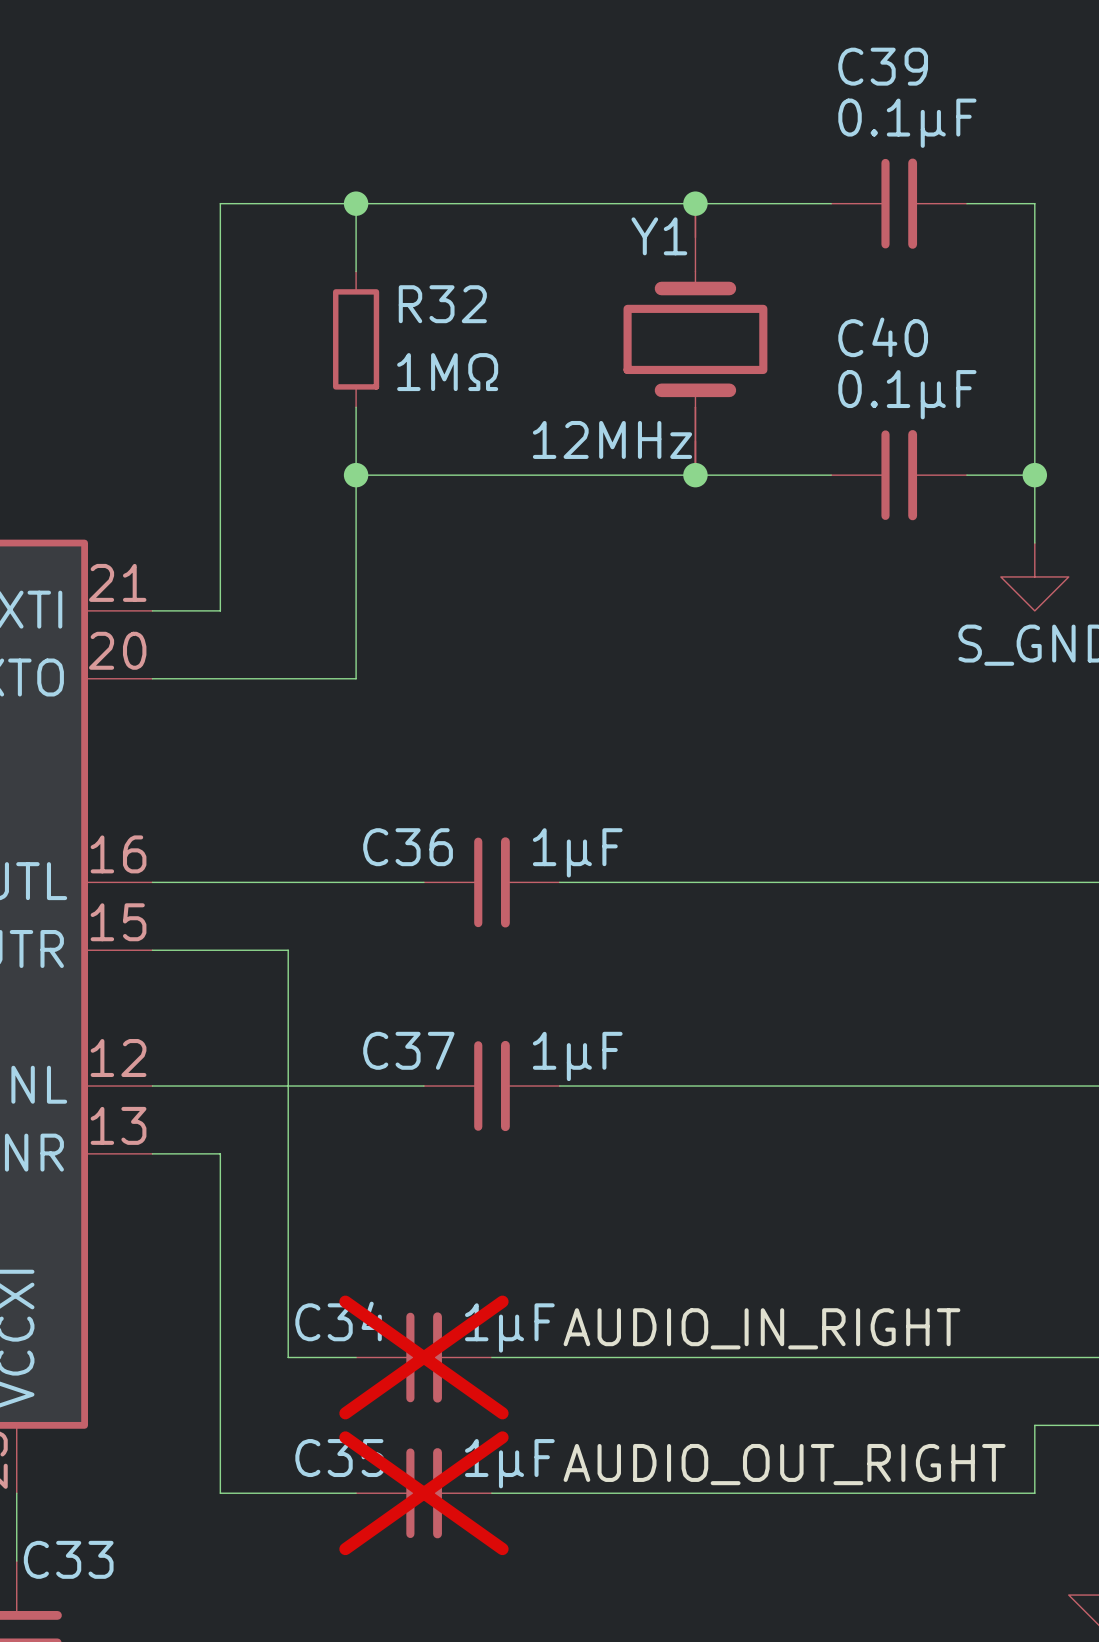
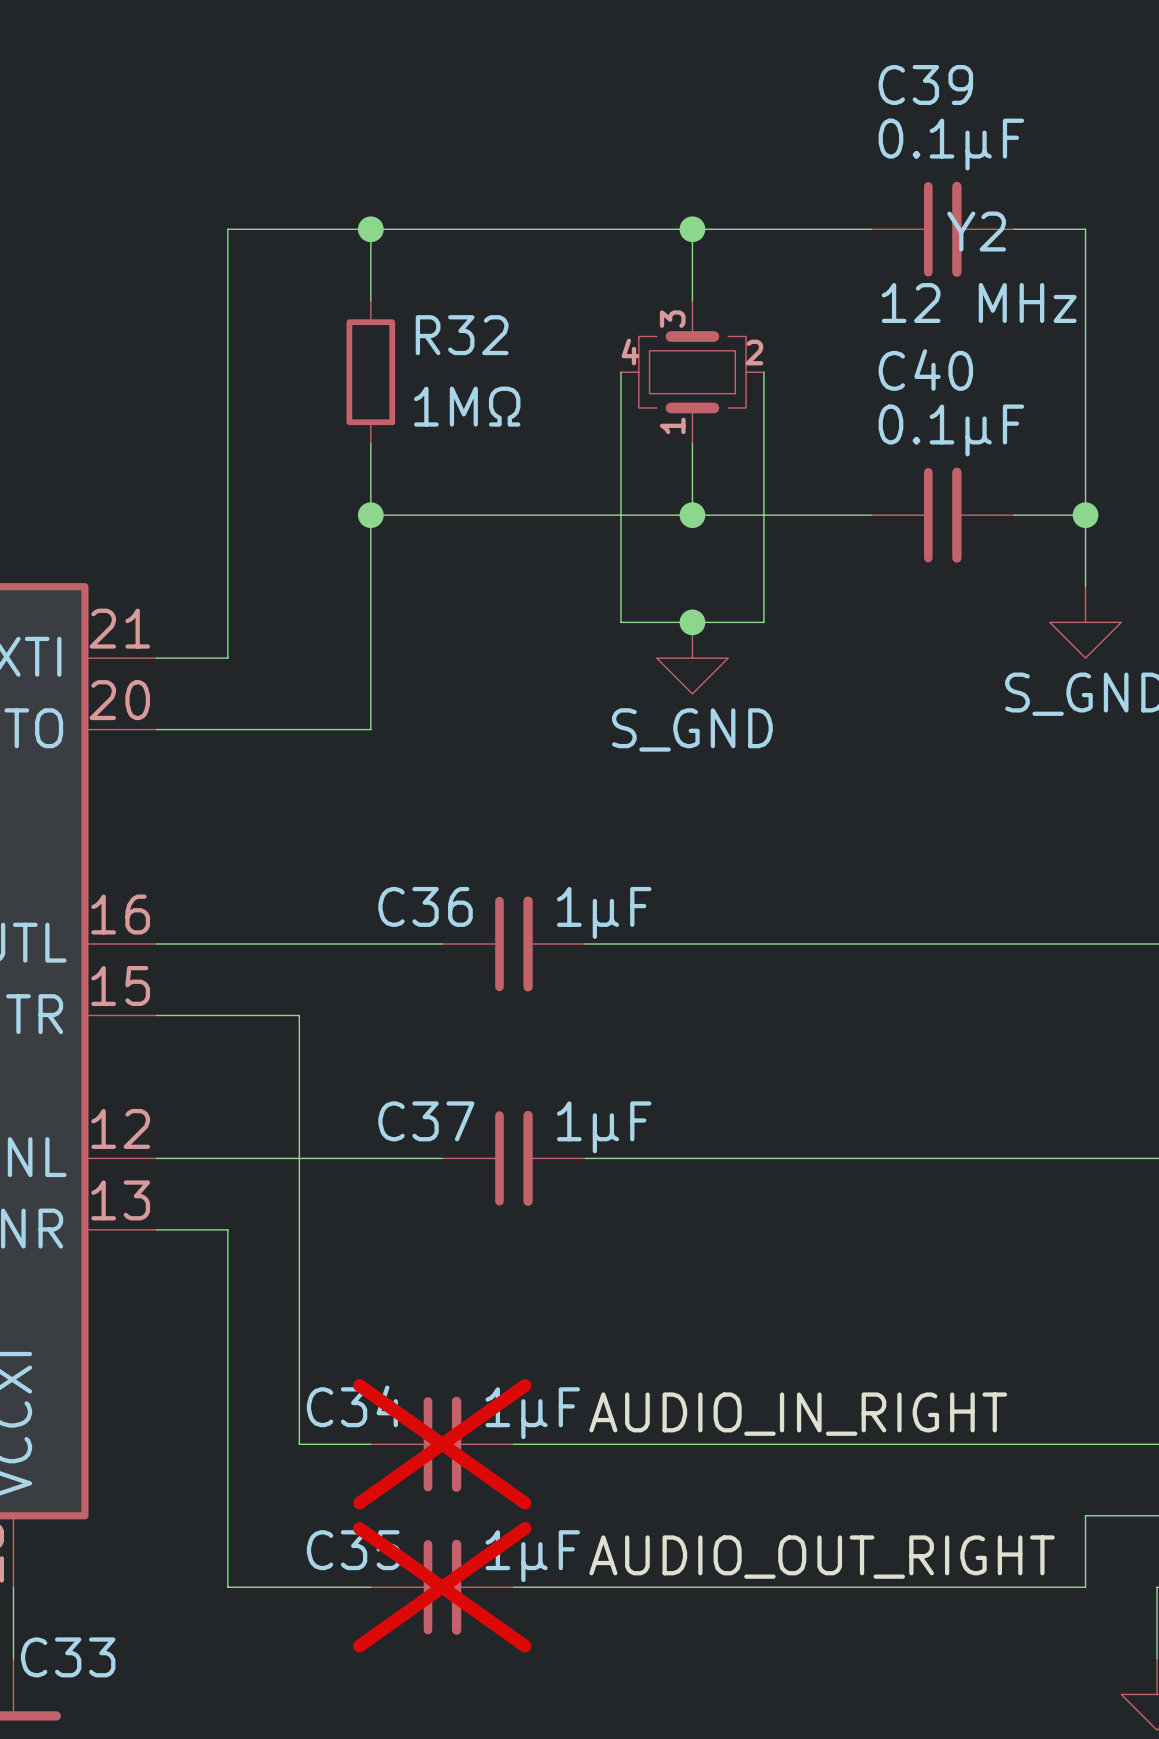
wire: none -> (692, 229) (692, 300)
junction position: (695, 203) -> (692, 229)
wire: none -> (620, 372) (620, 622) (763, 622) (763, 372)
Y2: none -> 12 MHz (692, 372)
Y1: 12MHz (695, 339) -> none
wire: none -> (692, 443) (692, 515)
junction position: (695, 475) -> (692, 515)
junction: none -> (692, 622)
power symbol: none -> S_GND (692, 658)

